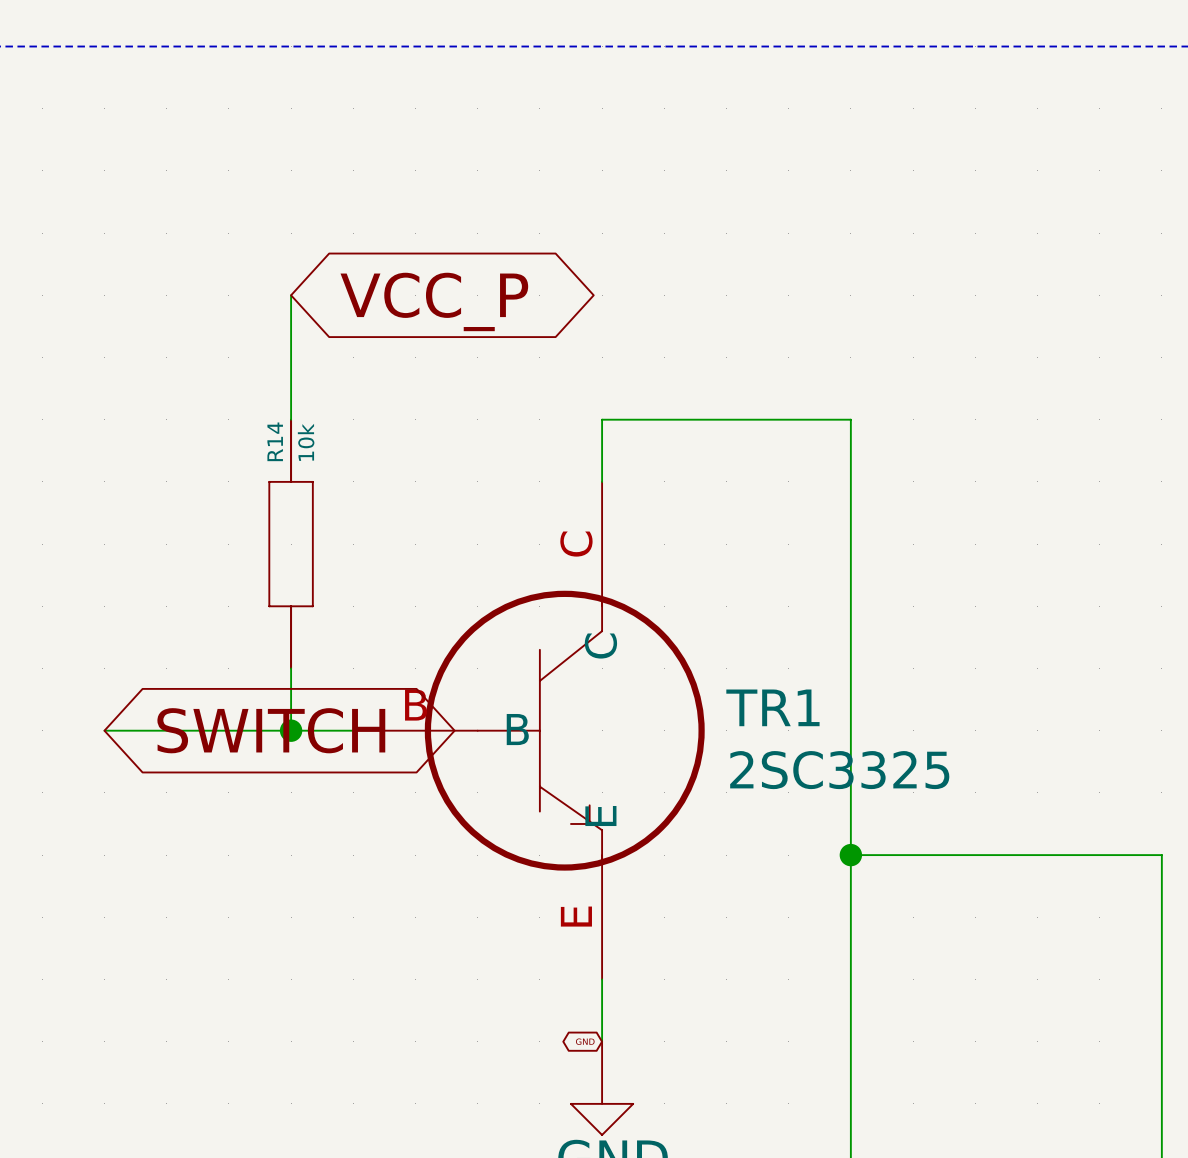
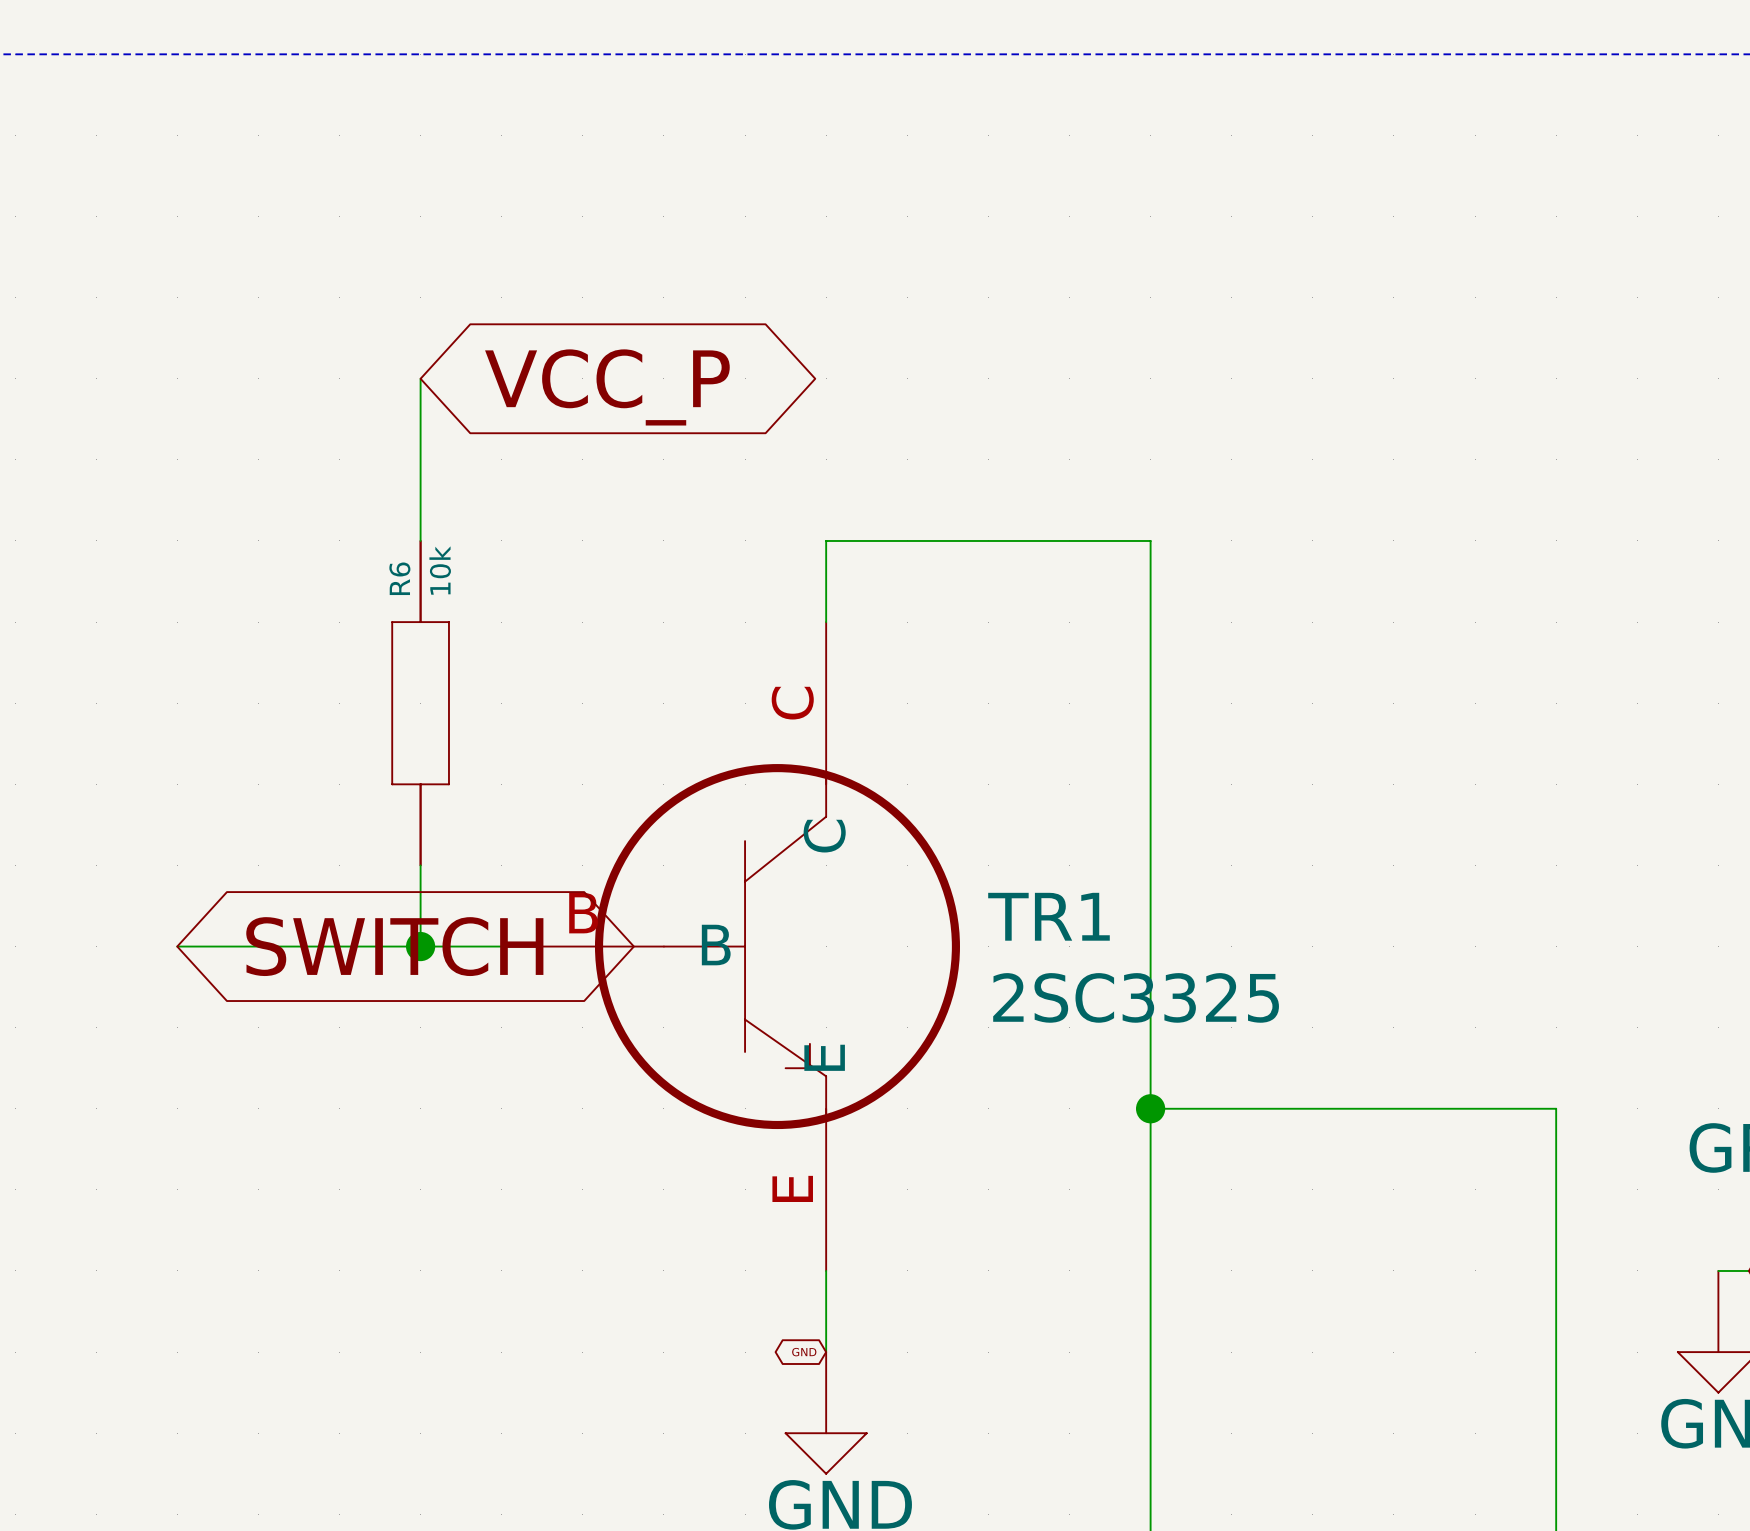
R14 name: R14 (275, 441) -> R6 (399, 578)

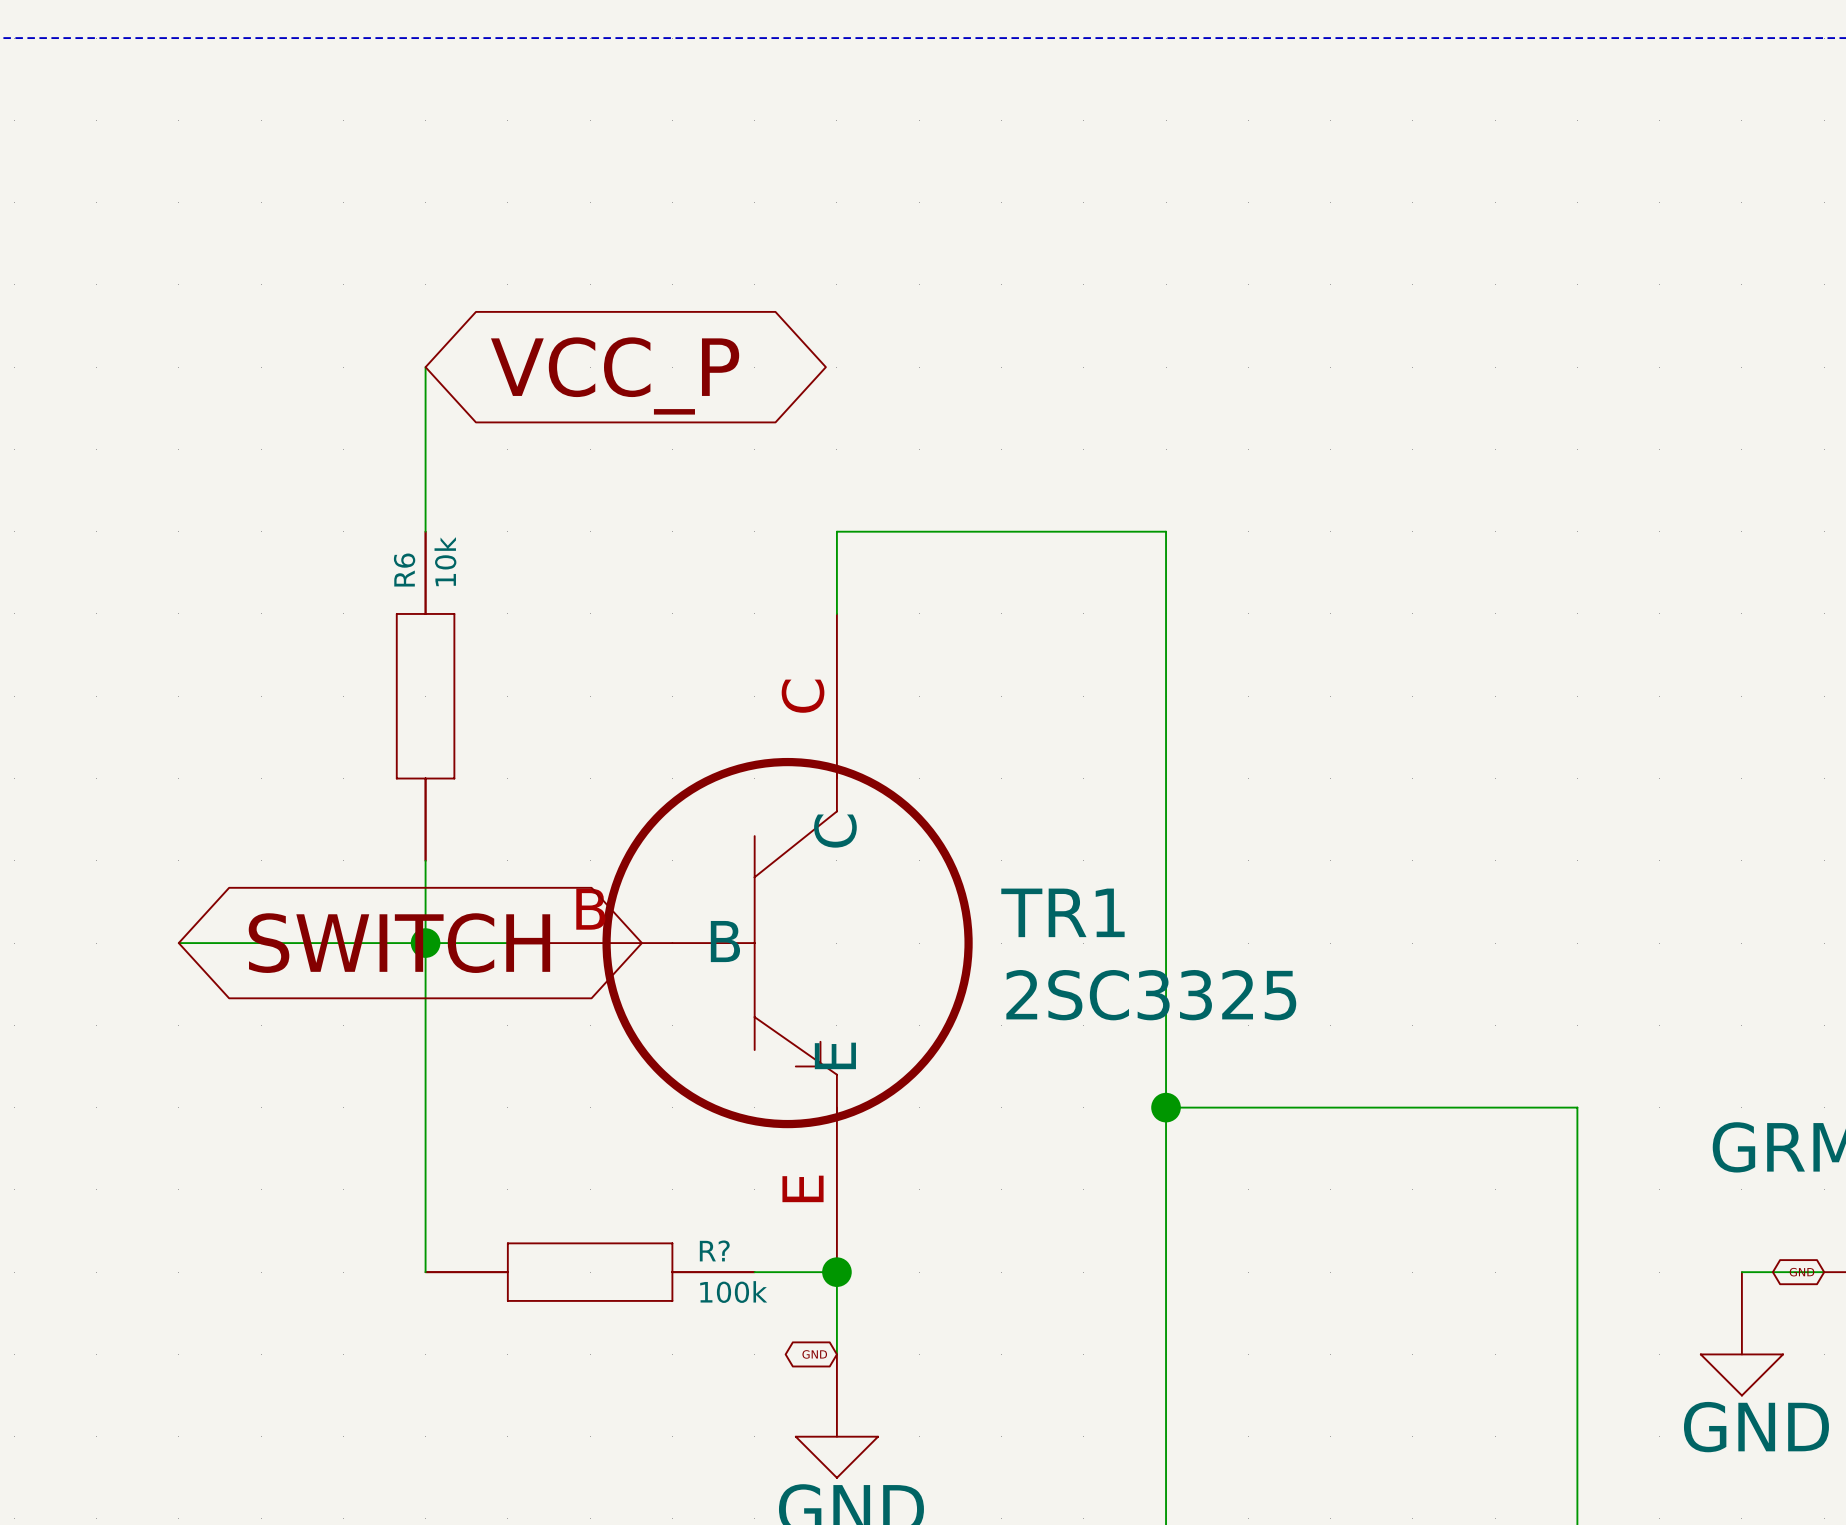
wire: none -> (425, 943) (425, 1272)
R?: none -> 100k (590, 1272)
wire: none -> (754, 1272) (836, 1272)
junction: none -> (836, 1272)

